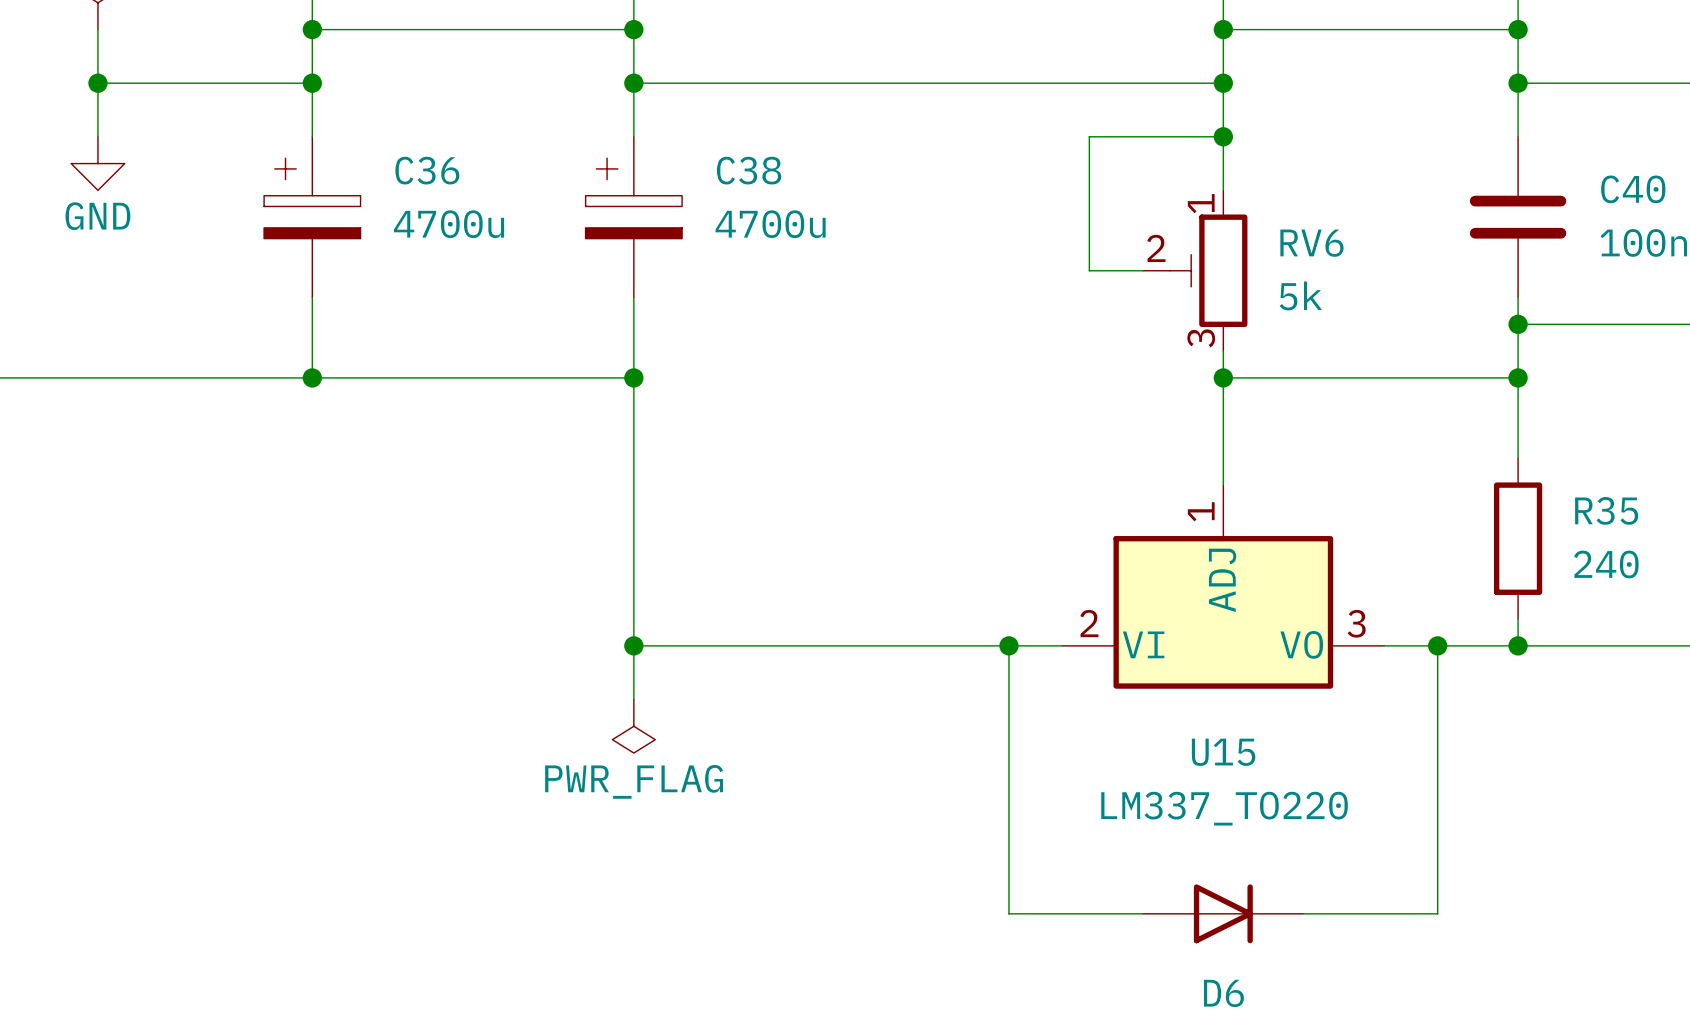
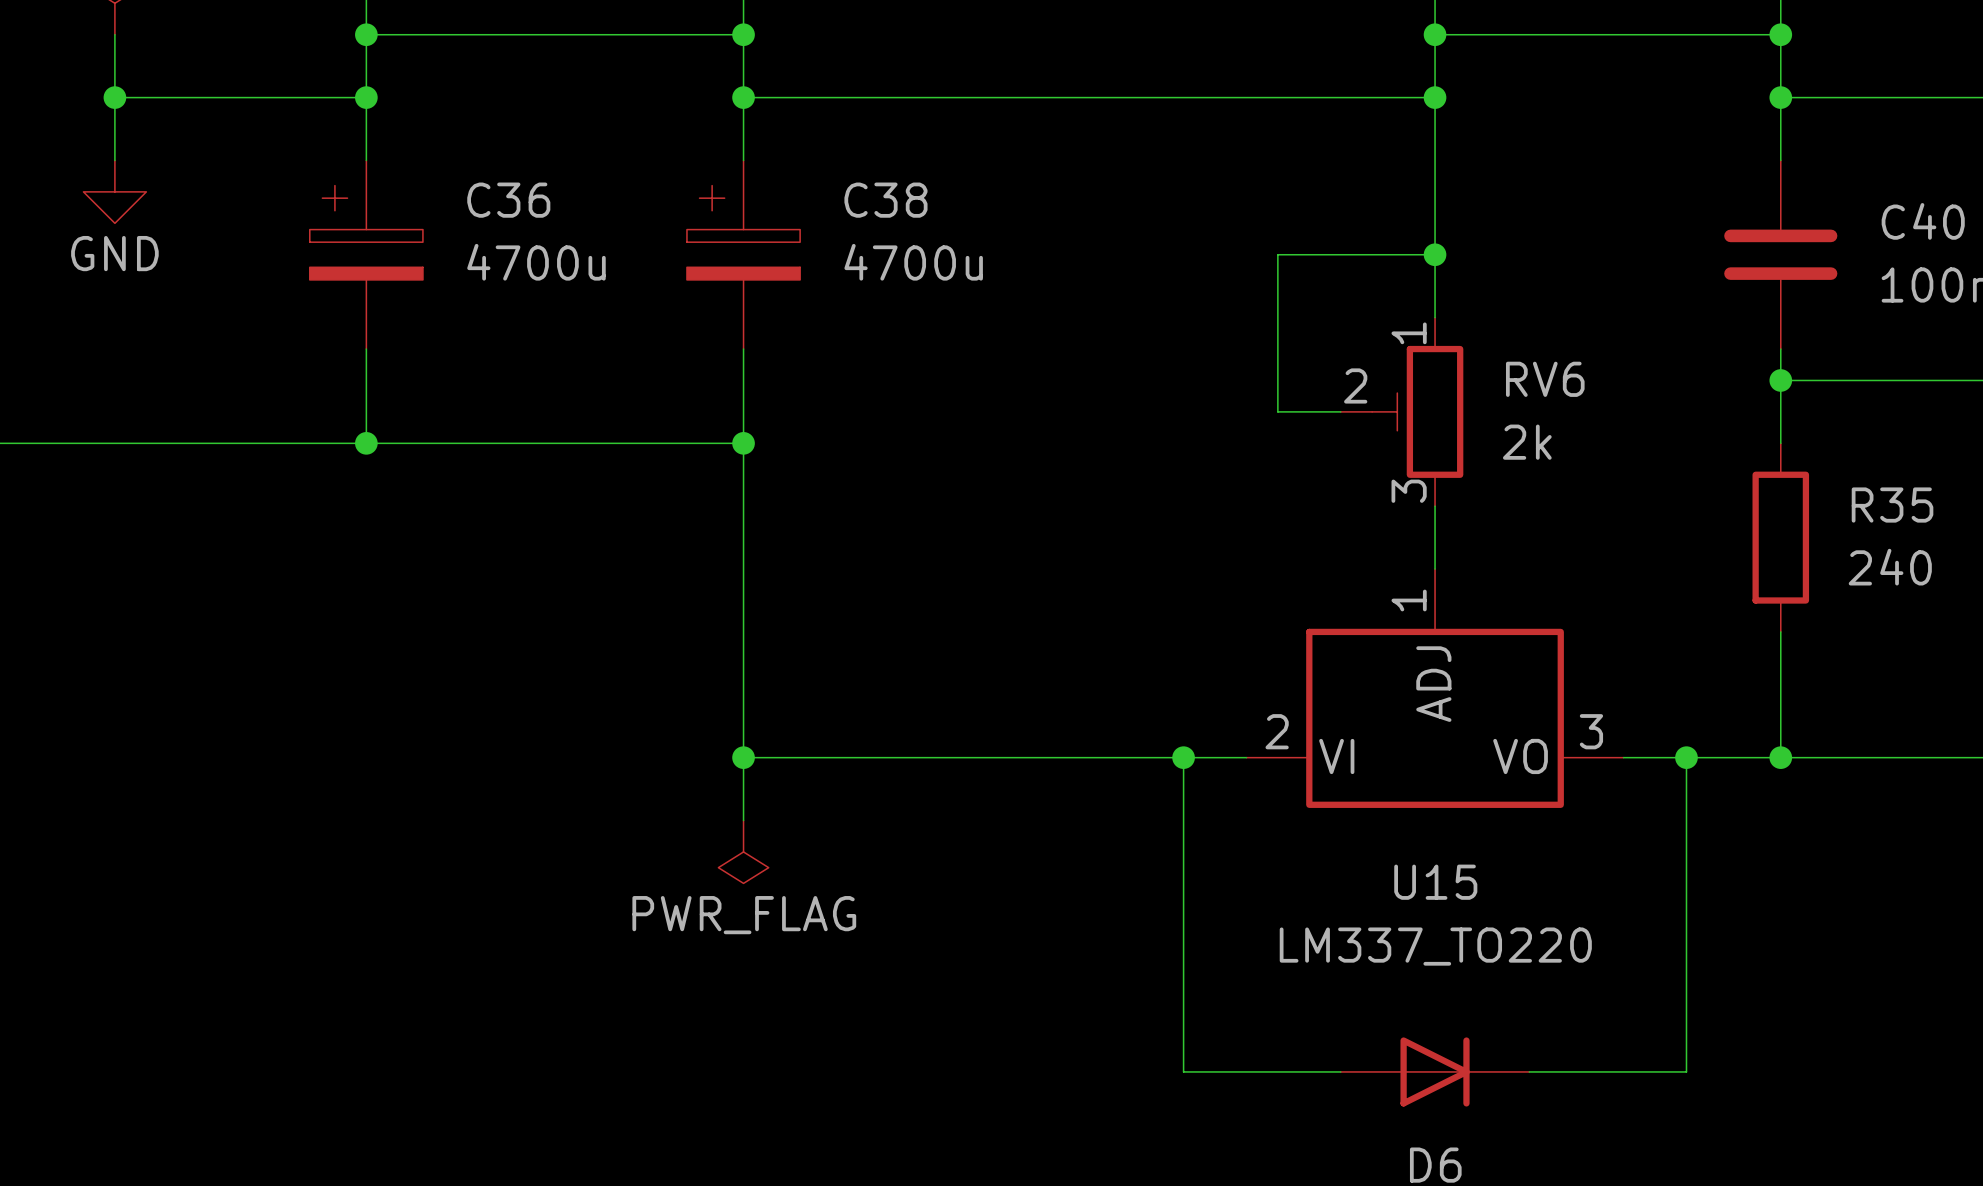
wire: (1223, 136) (1089, 136) (1089, 217) -> (1435, 254) (1277, 254)
junction: (1223, 136) -> none
junction: none -> (1435, 254)
wire: (1089, 270) (1142, 270) -> (1277, 317) (1277, 411) (1340, 411)
RV6 position: (1195, 270) -> (1402, 411)
RV6 value: 5k (1300, 295) -> 2k (1527, 442)
wire: (1223, 351) (1223, 431) -> (1435, 223) (1435, 317)
wire: (1223, 377) (1518, 377) (1518, 458) -> none
junction: (1223, 377) -> none
junction: (1518, 377) -> none
wire: none -> (1780, 631) (1780, 726)
R35 position: (1518, 538) -> (1780, 537)

